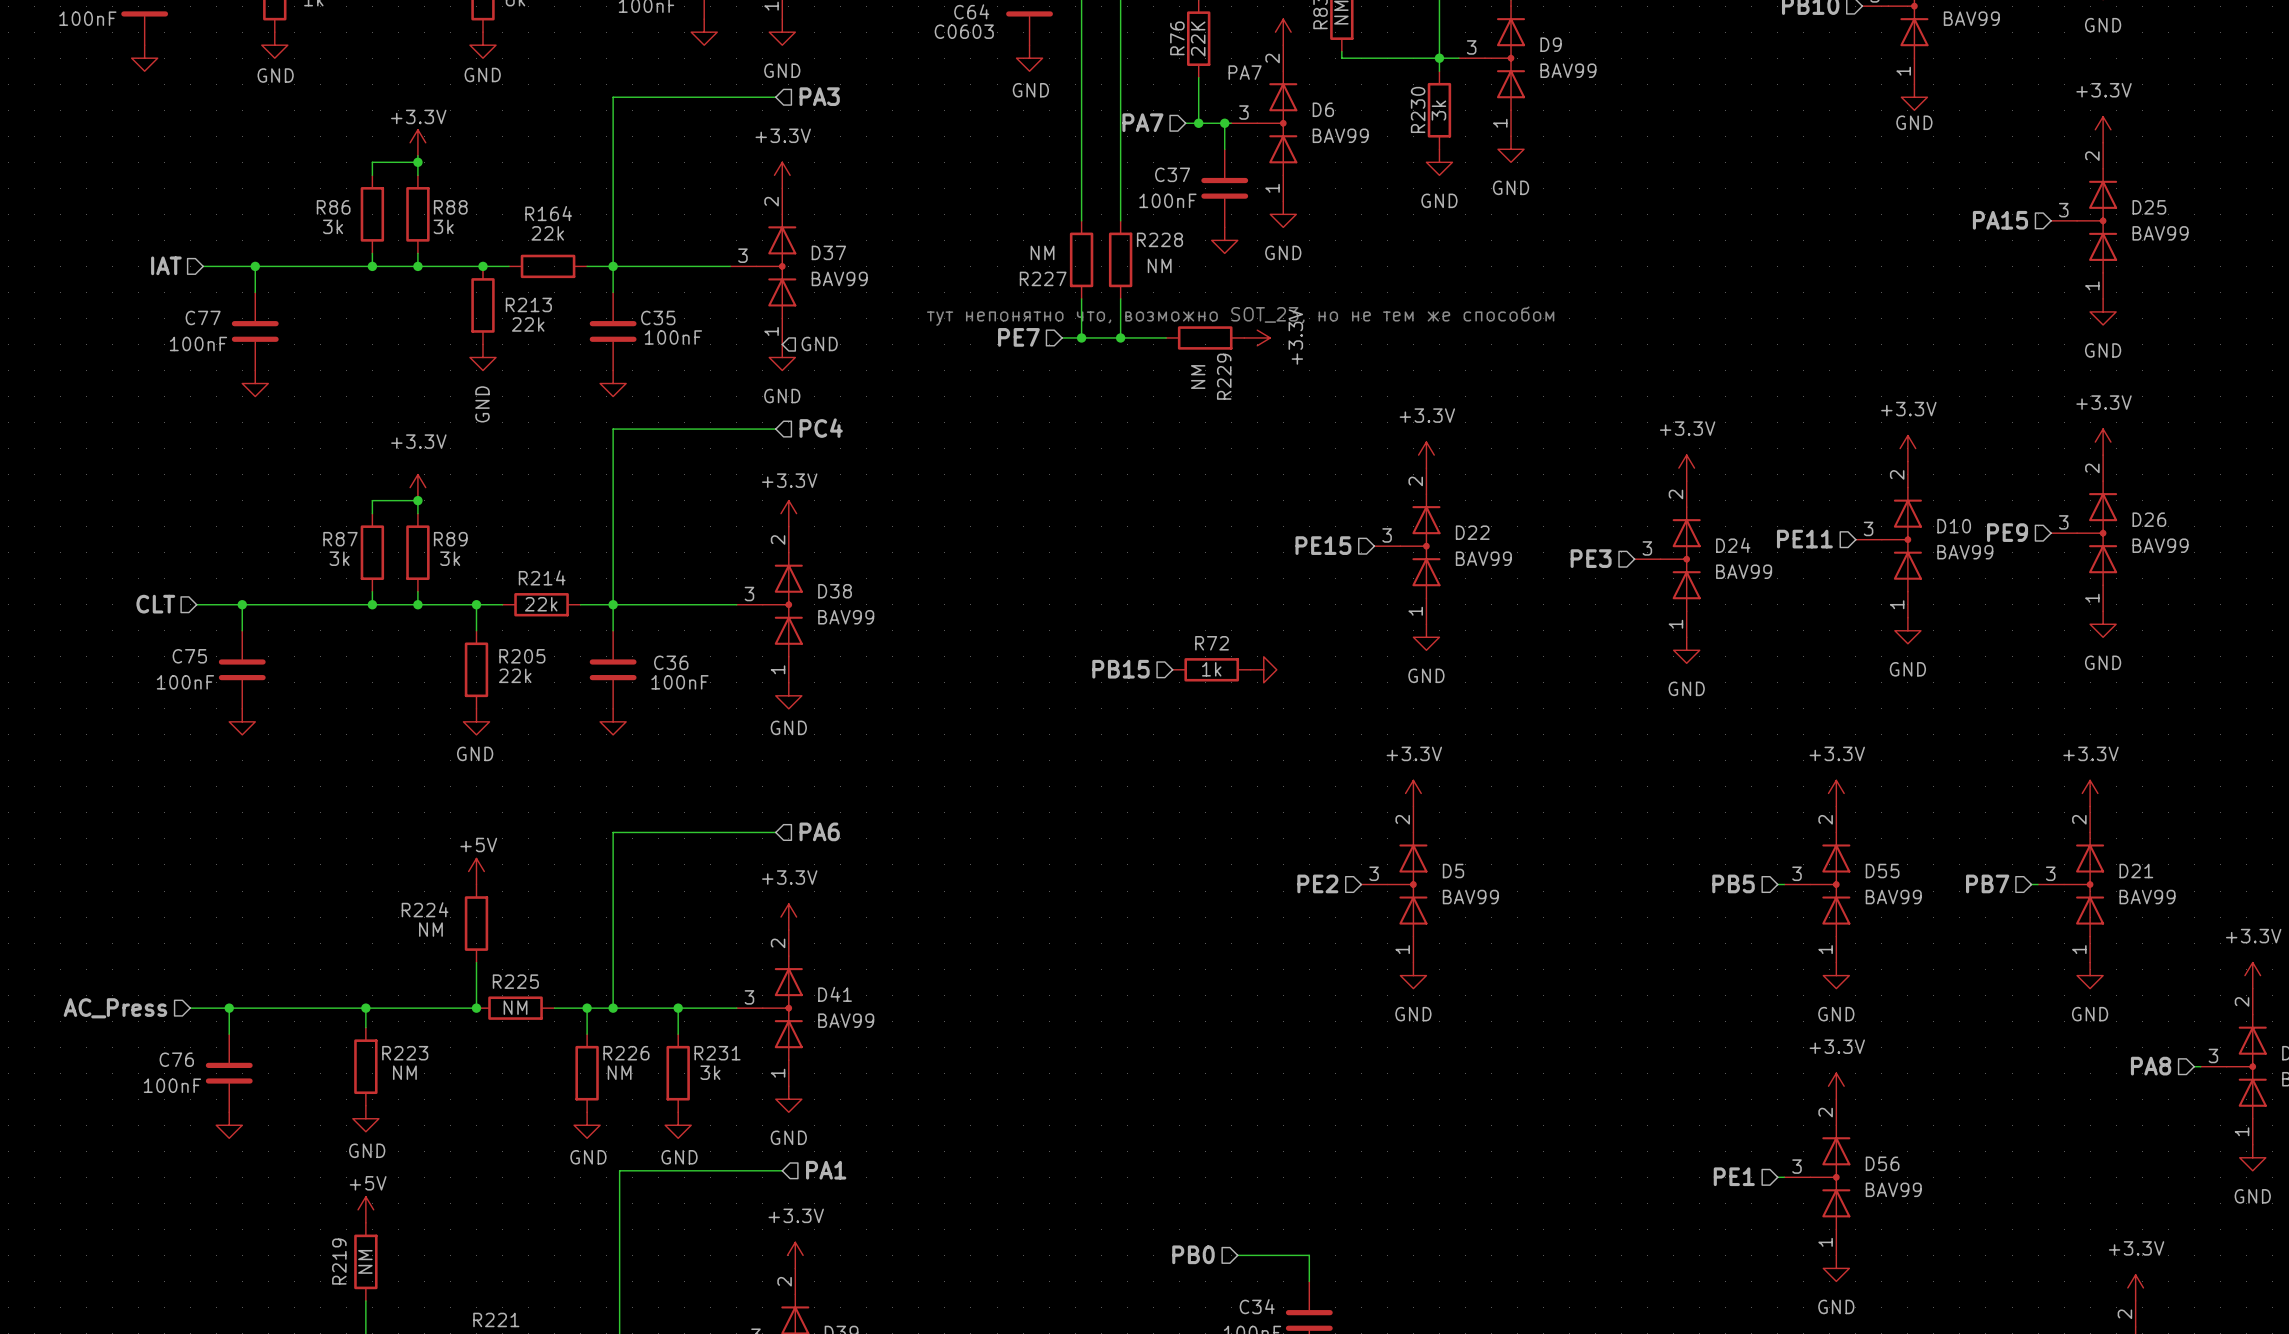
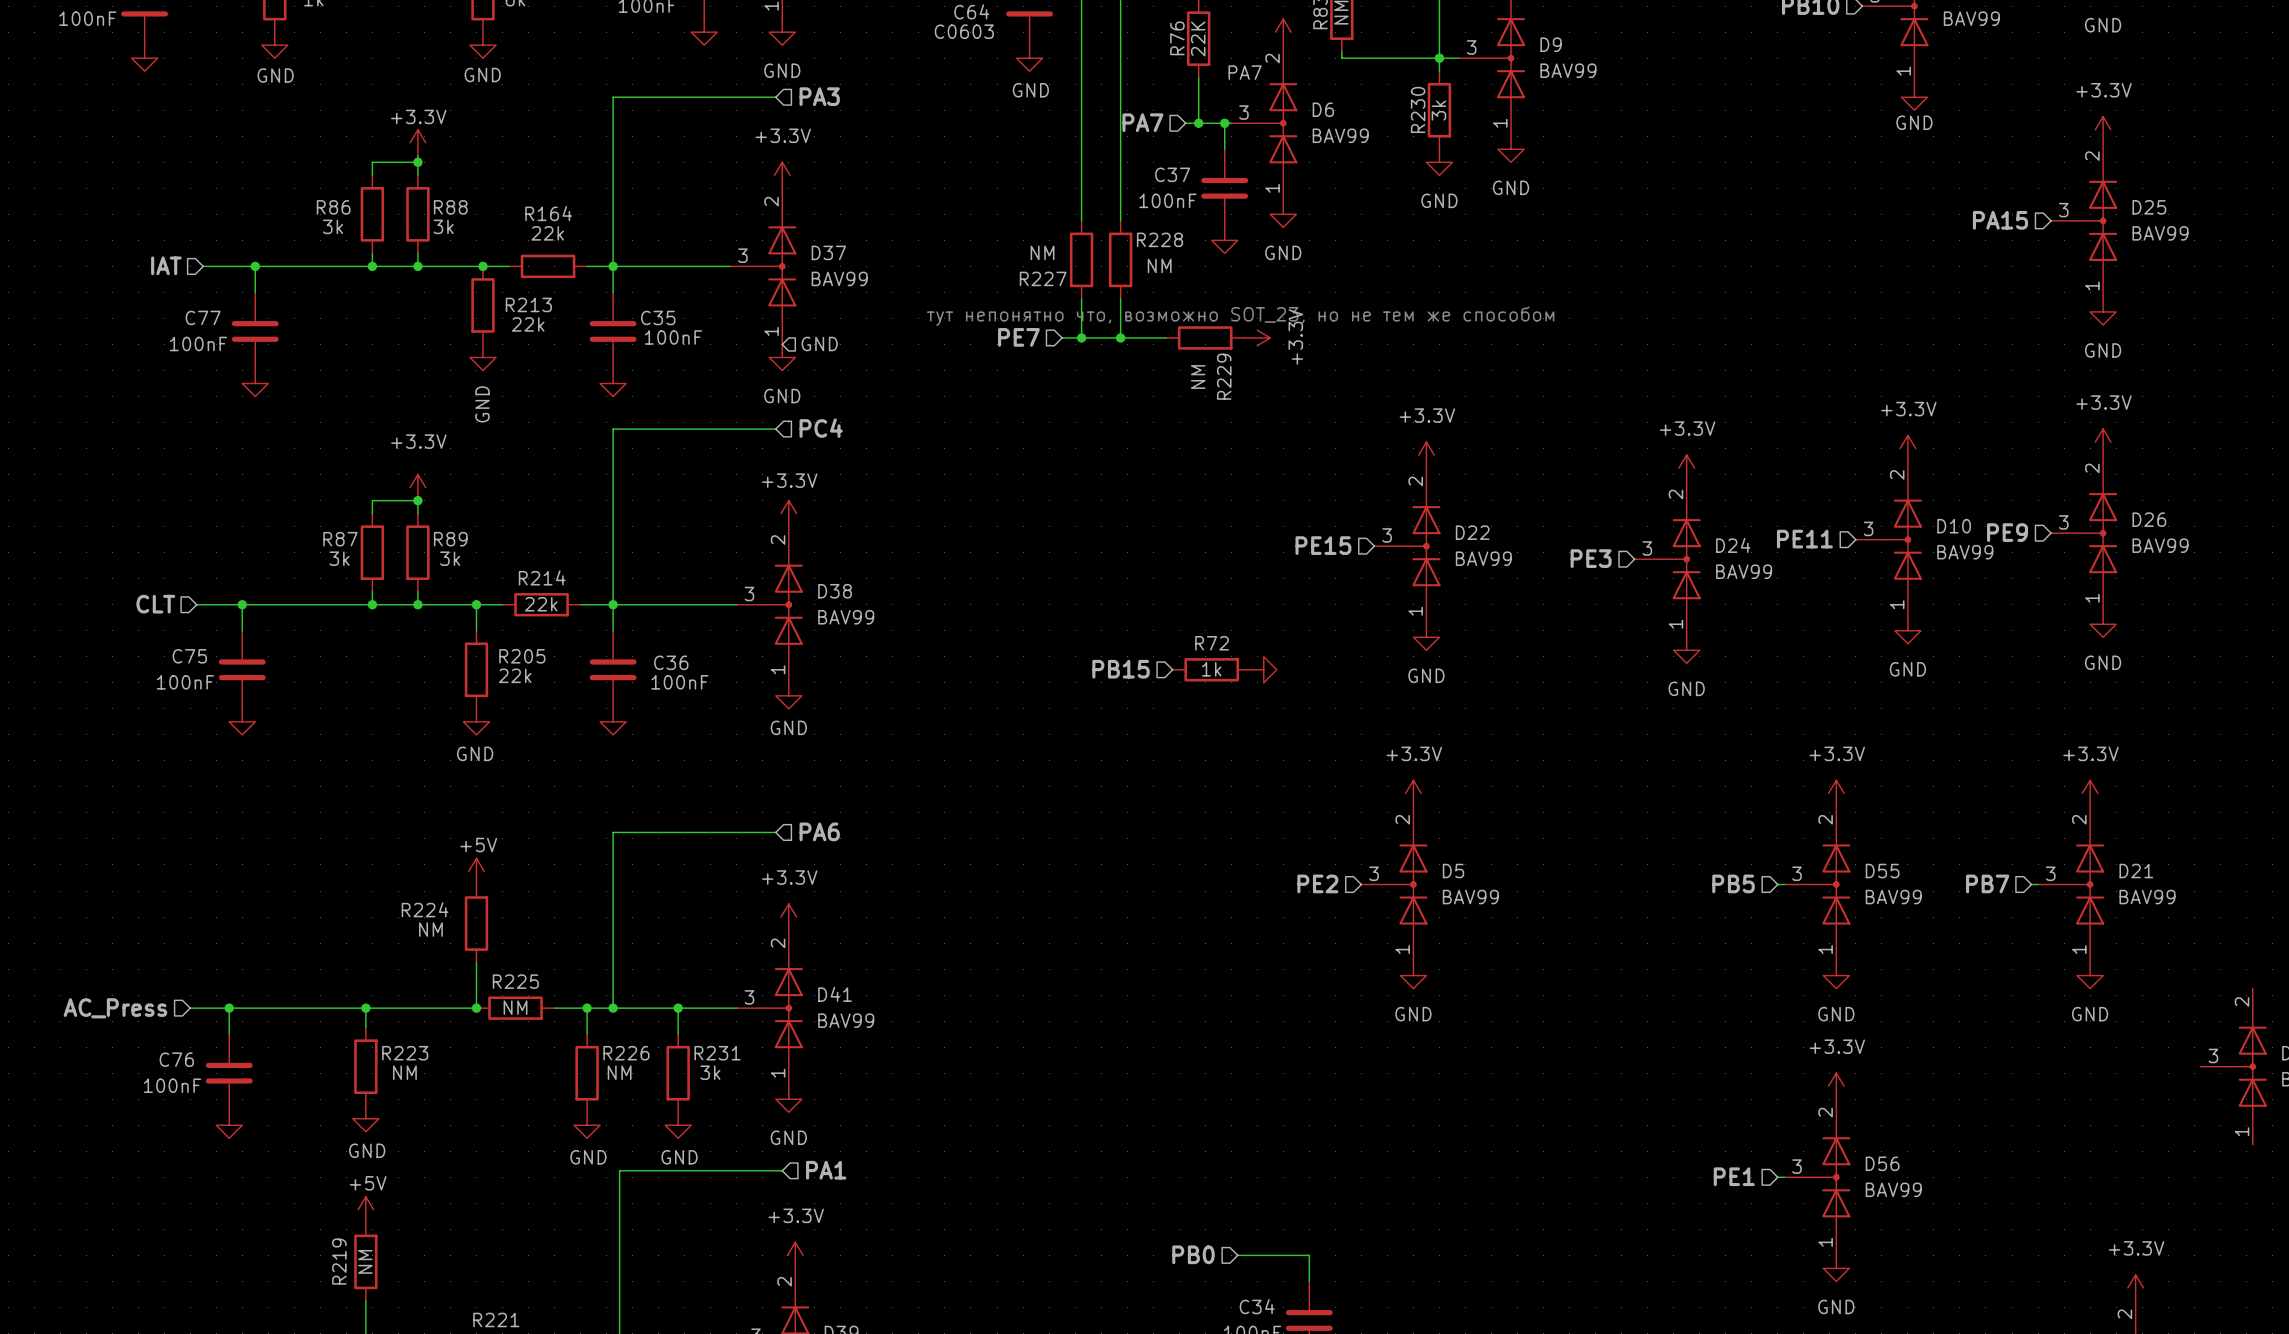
power symbol: +3.3V (2252, 975) -> none
hierarchical label: PA8 (2151, 1066) -> none
wire: (2194, 1066) (2200, 1066) -> none
power symbol: GND (2252, 1157) -> none

